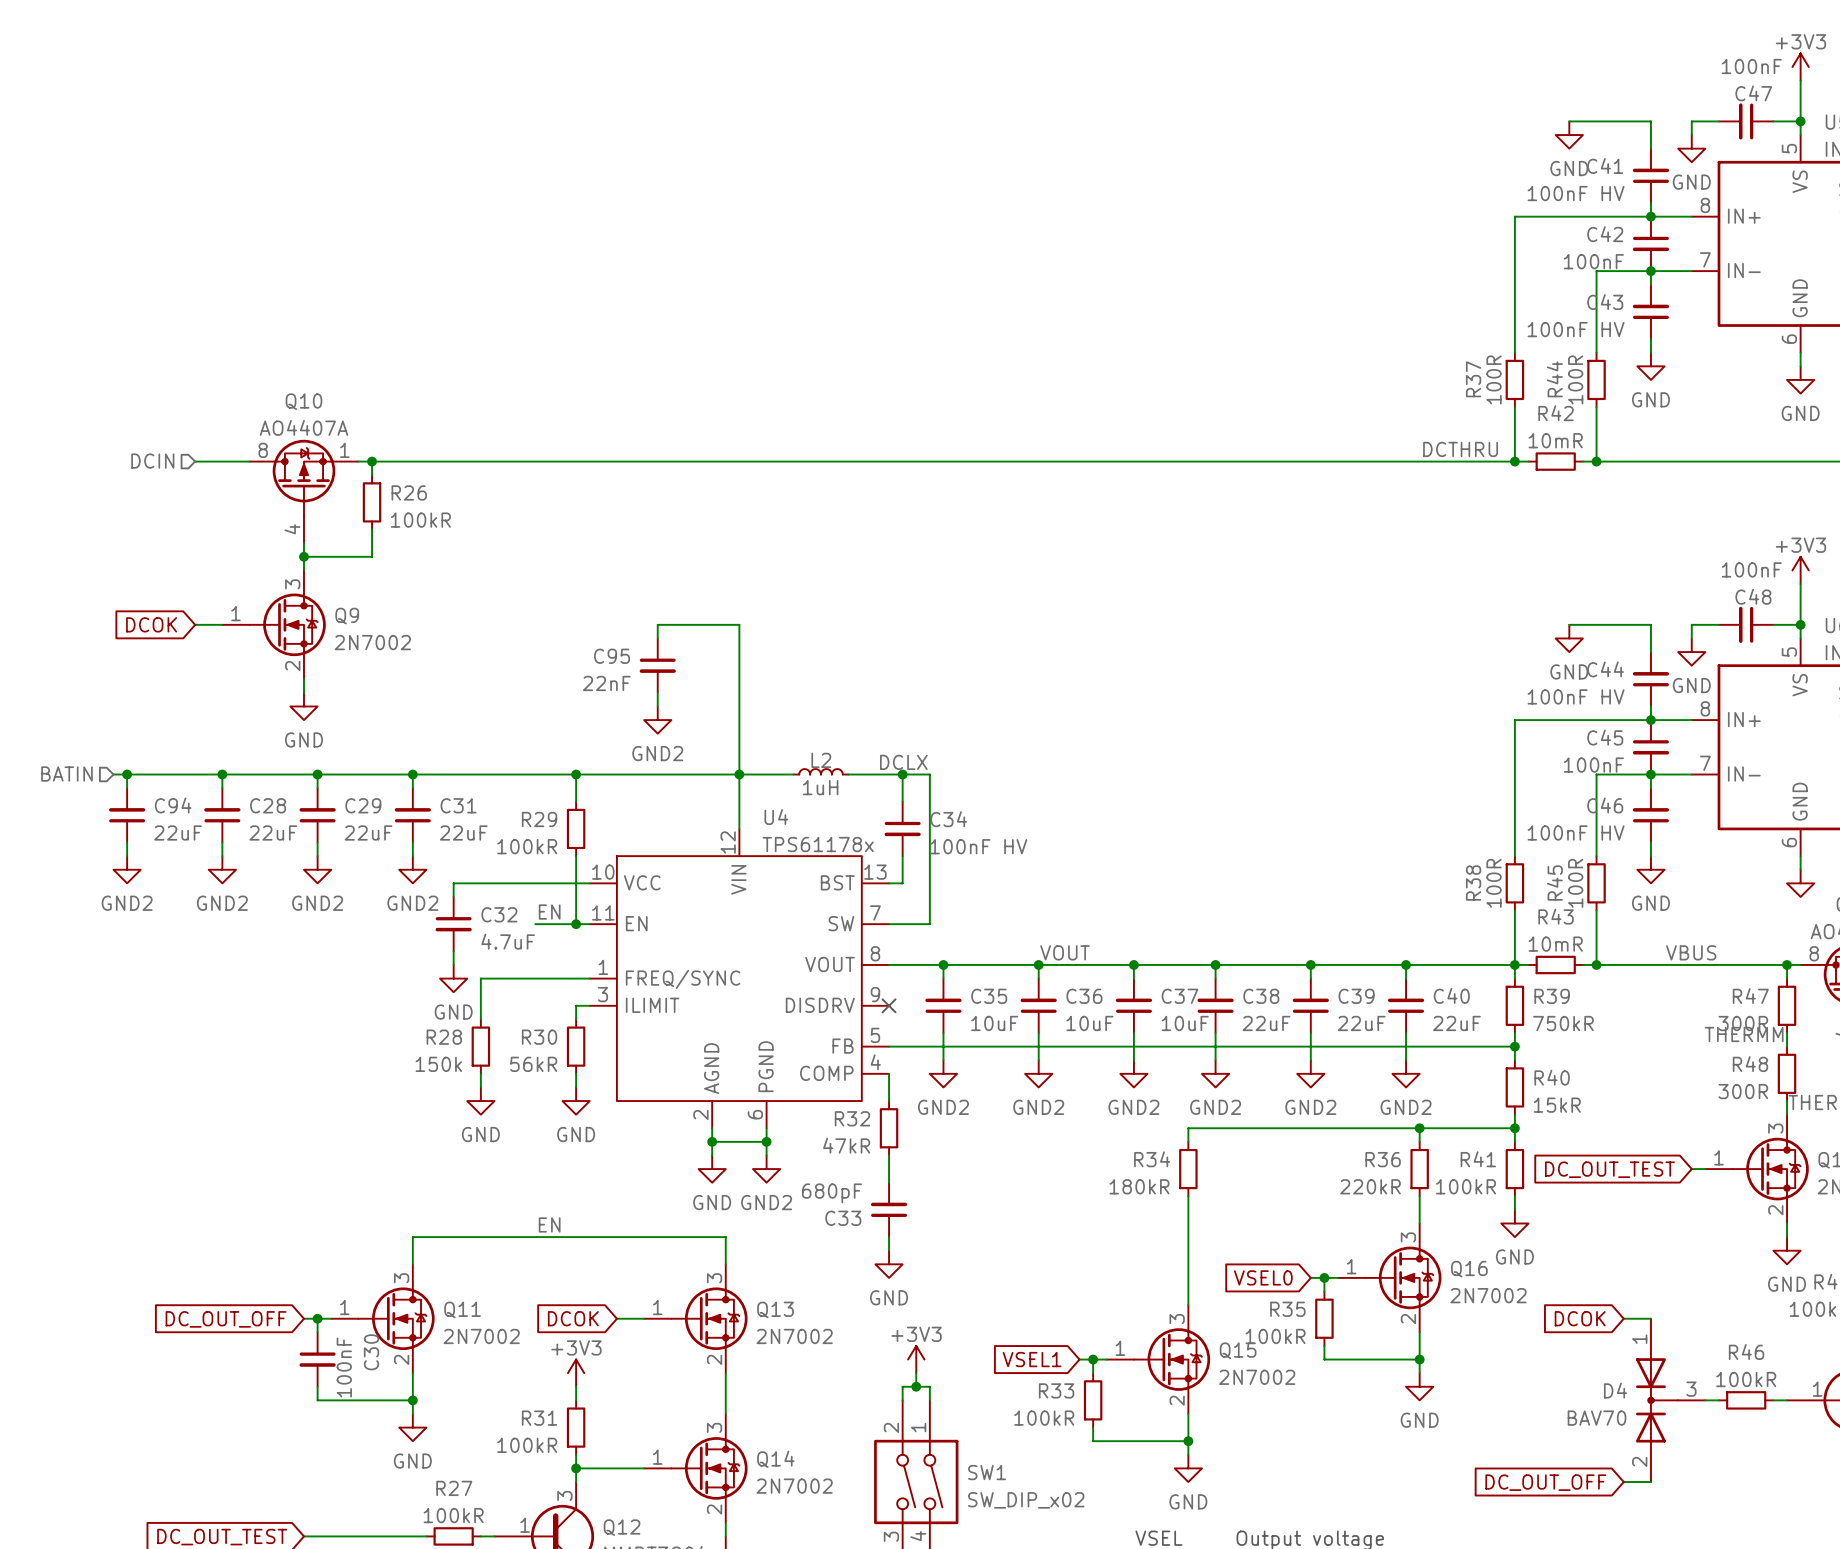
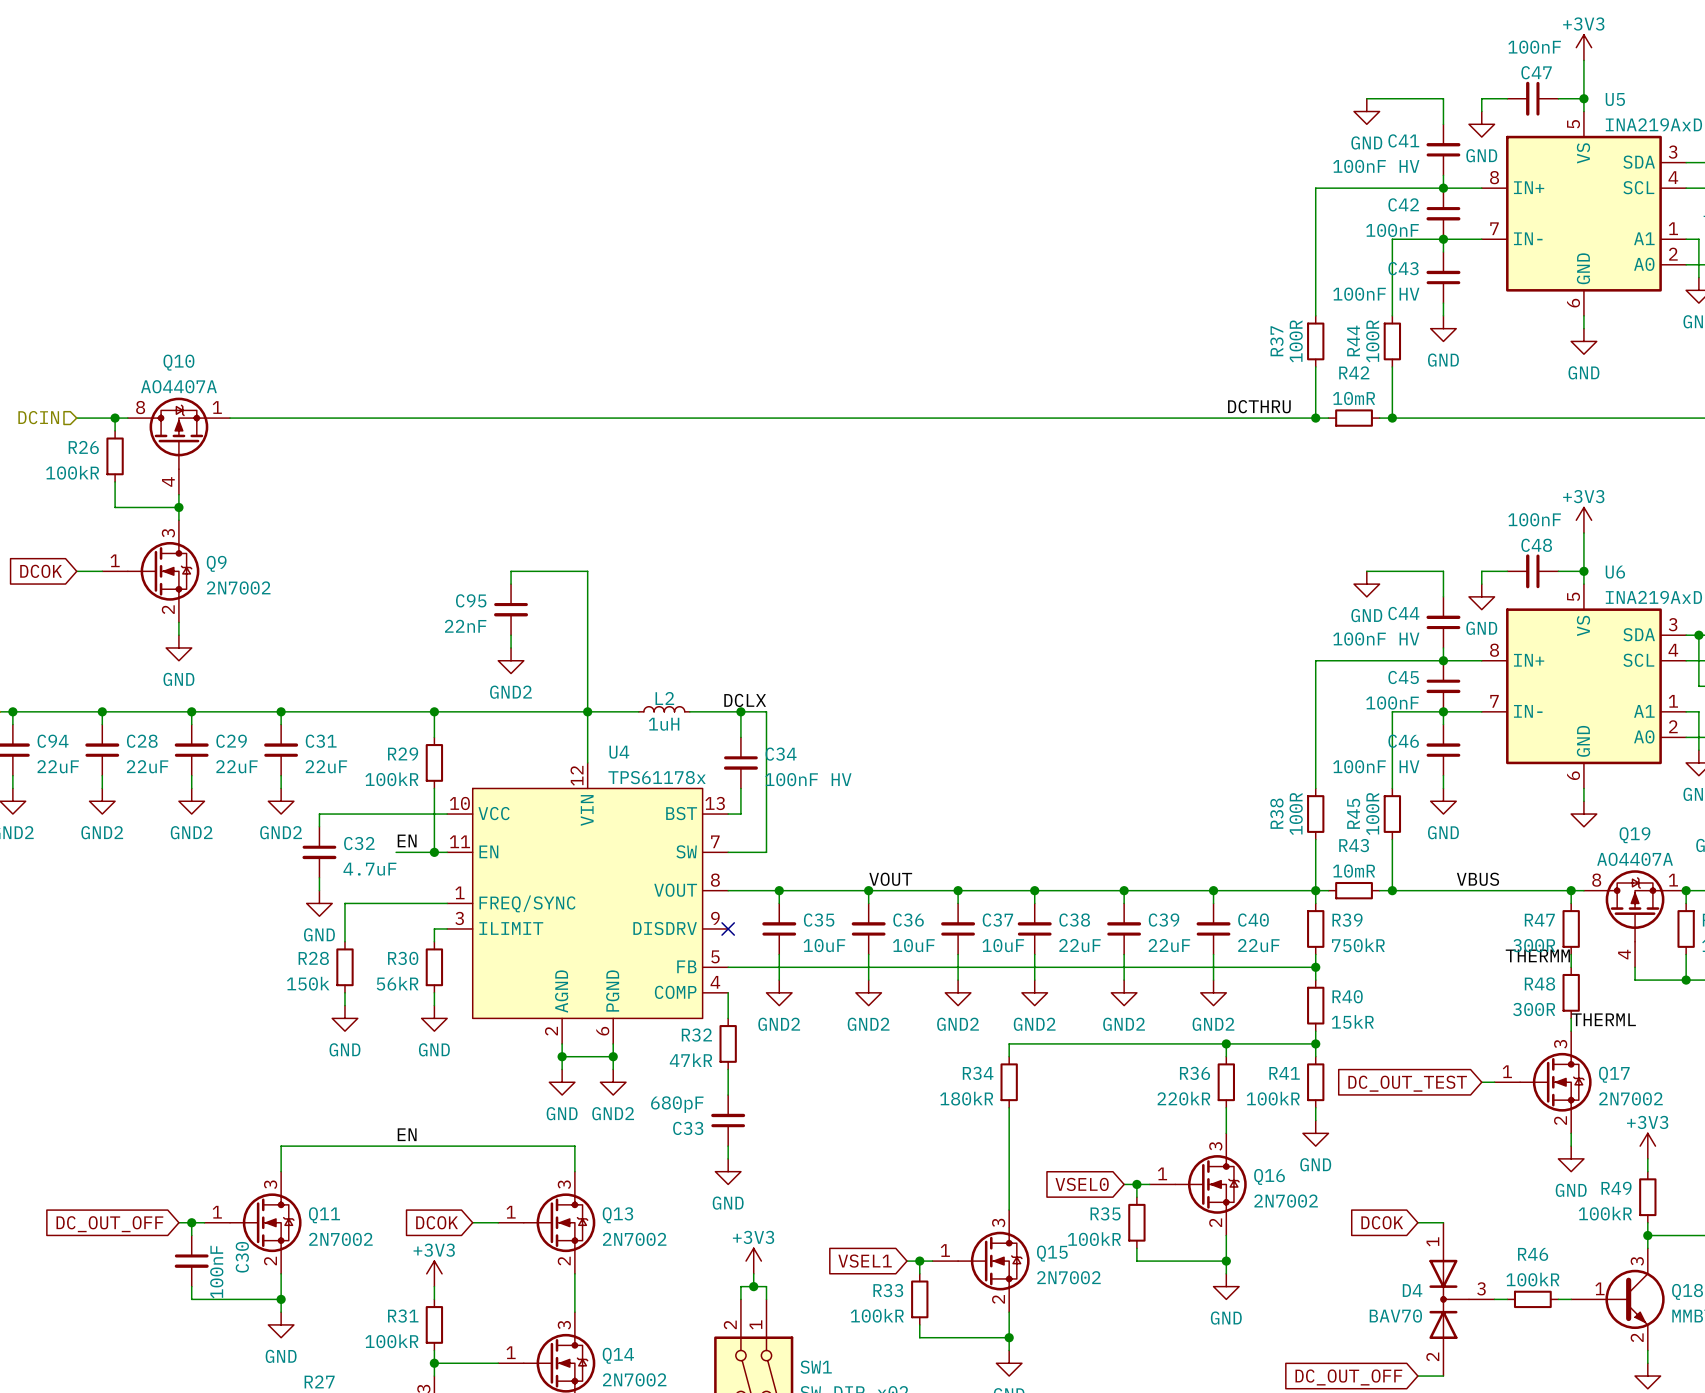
junction: none -> (115, 418)
wire: (372, 461) (372, 475) -> (115, 418) (115, 430)
junction: (372, 461) -> none
R26 name position: R26 (409, 492) -> R26 (83, 447)
R26 position: (372, 502) -> (115, 456)
R26 value position: 100kR (420, 520) -> 100kR (72, 472)
wire: (372, 529) (372, 556) (303, 556) -> (115, 481) (115, 507) (178, 507)

